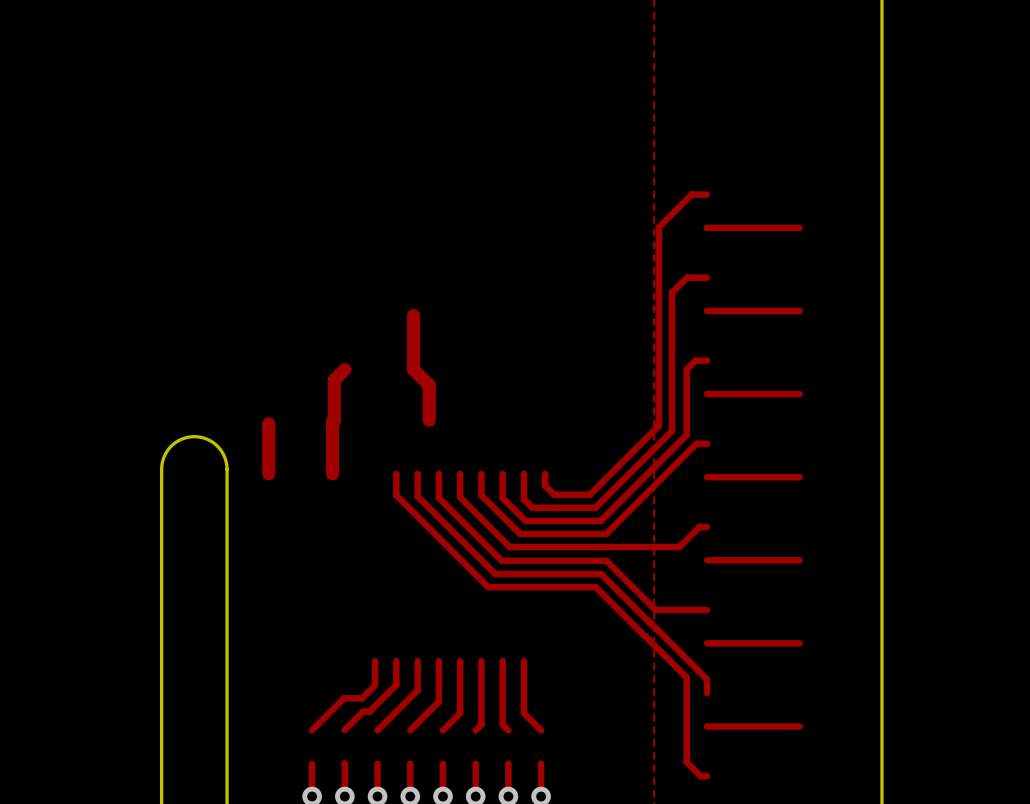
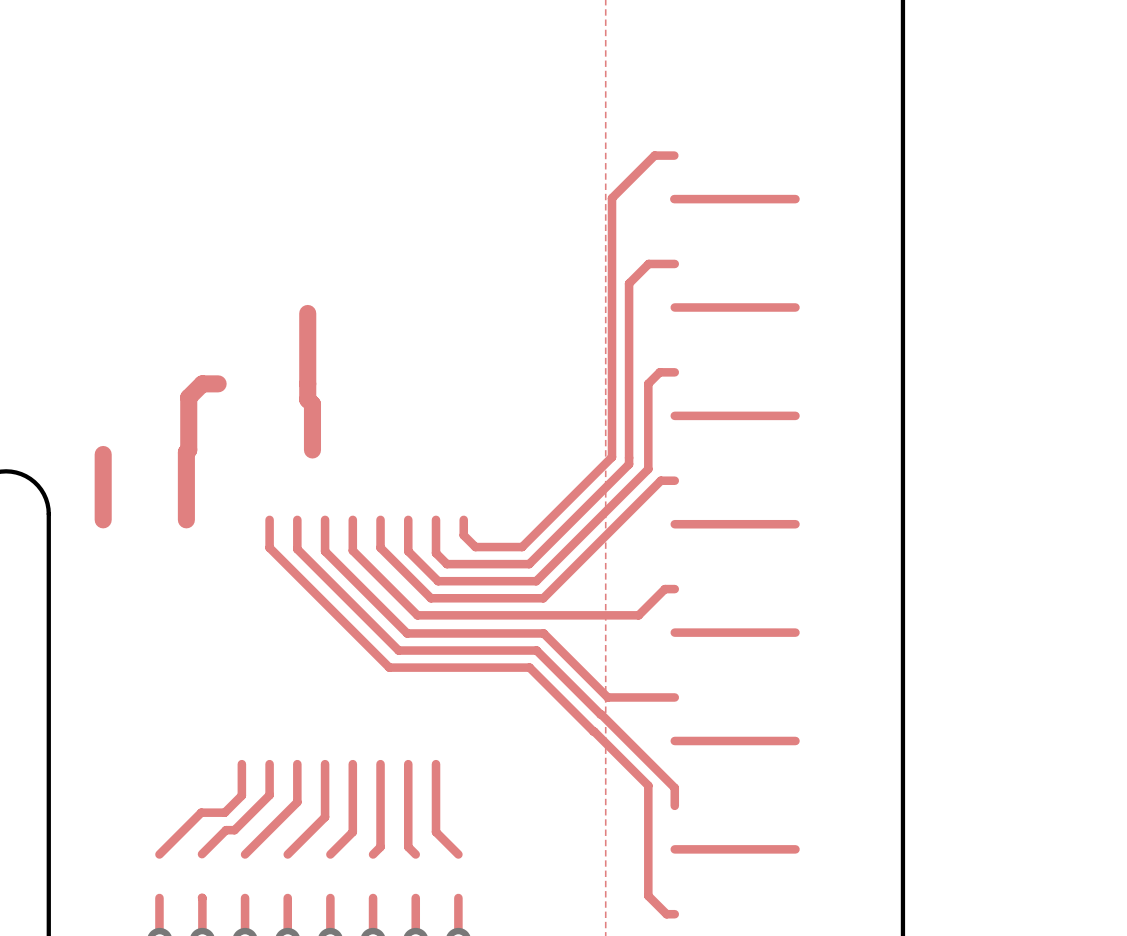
track: (413, 315) (413, 369) (425, 381) -> (307, 313) (307, 399)
track: none -> (202, 383) (218, 383)

